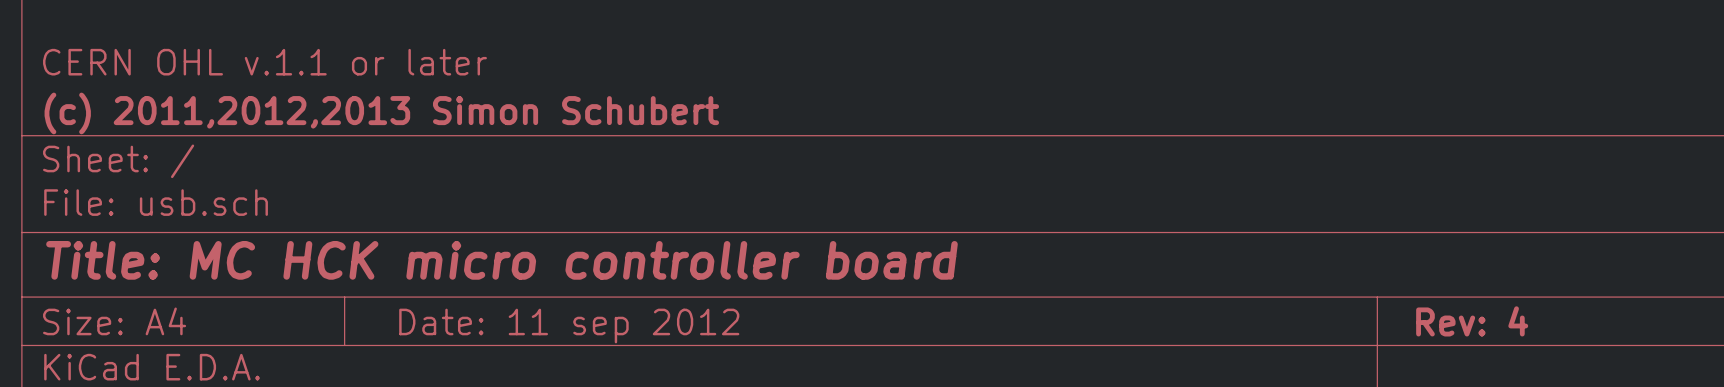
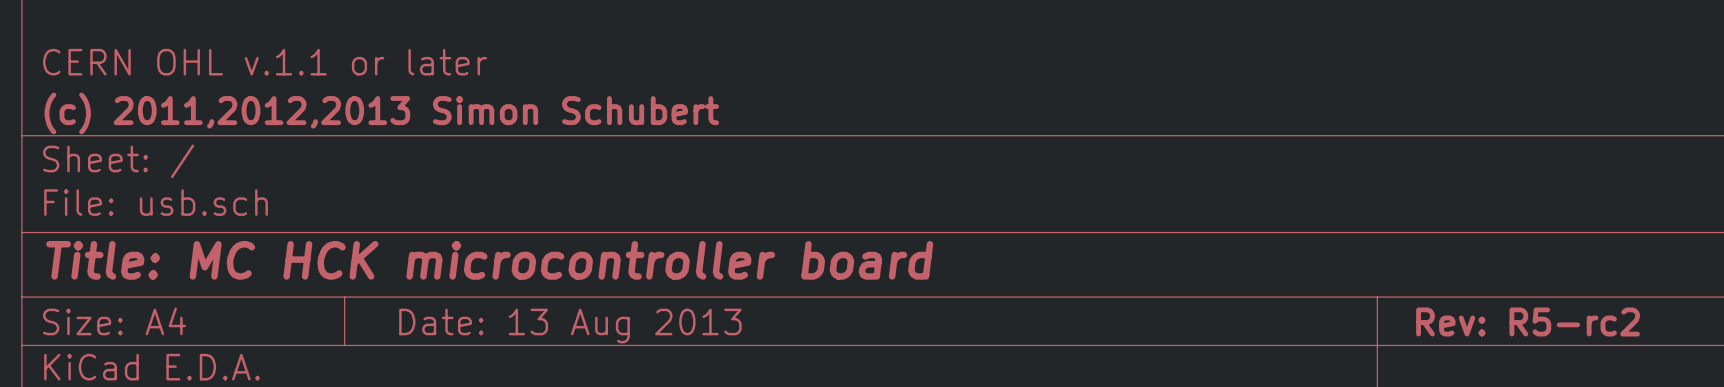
title block: Title: MC HCK micro controller board (501, 260) -> Title: MC HCK microcontroller board (489, 260)
title block: Rev: 4 (1472, 321) -> Rev: R5-rc2 (1528, 321)
title block: Date: 11 sep 2012 (569, 326) -> Date: 13 Aug 2013 (570, 326)

